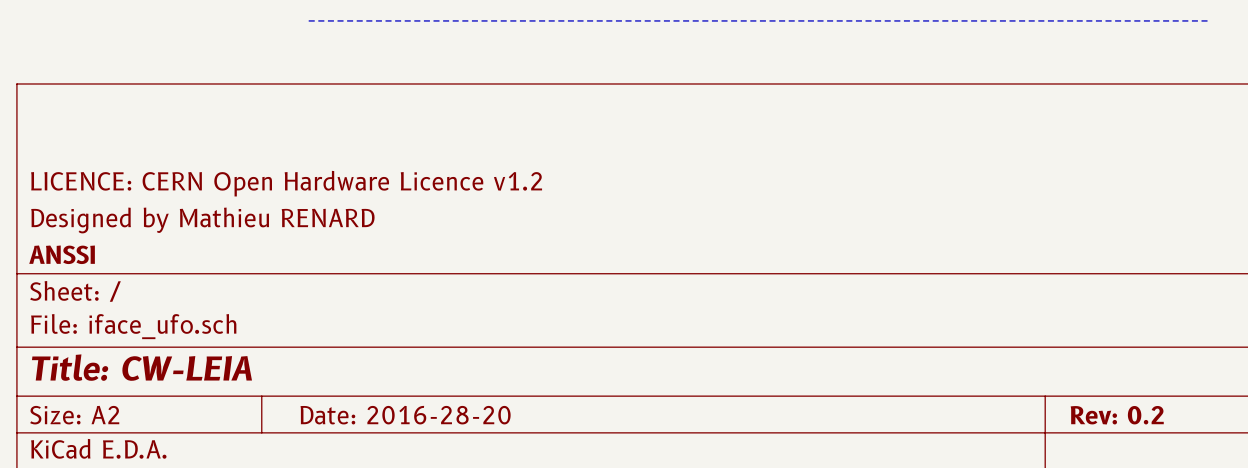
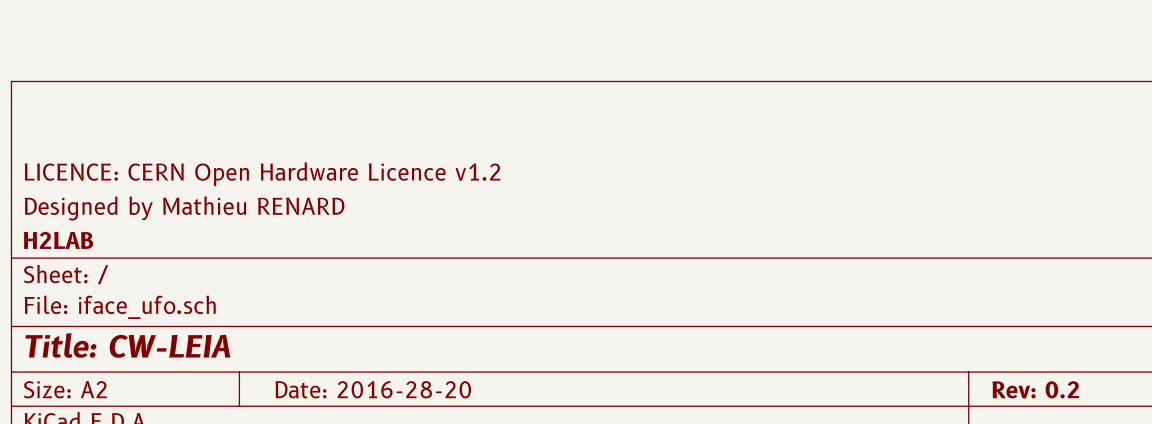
line: (308, 20) (1210, 20) -> none
title block: ANSSI (62, 254) -> H2LAB (58, 240)

